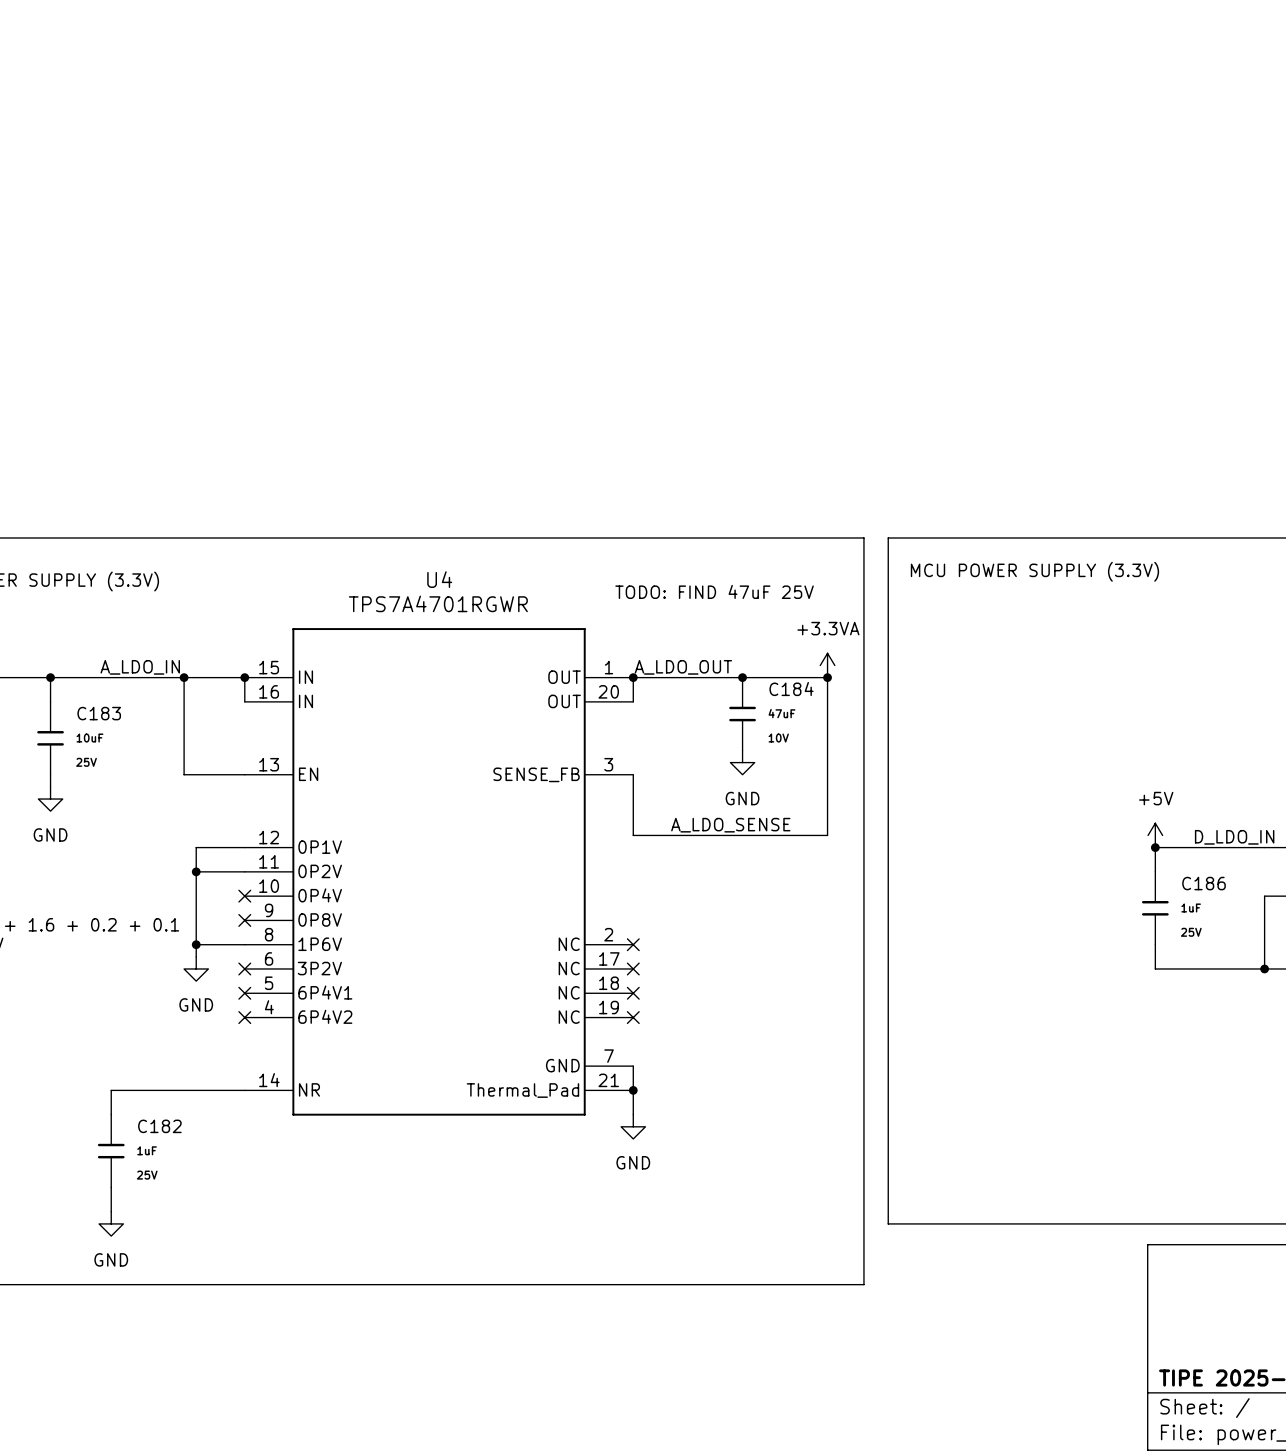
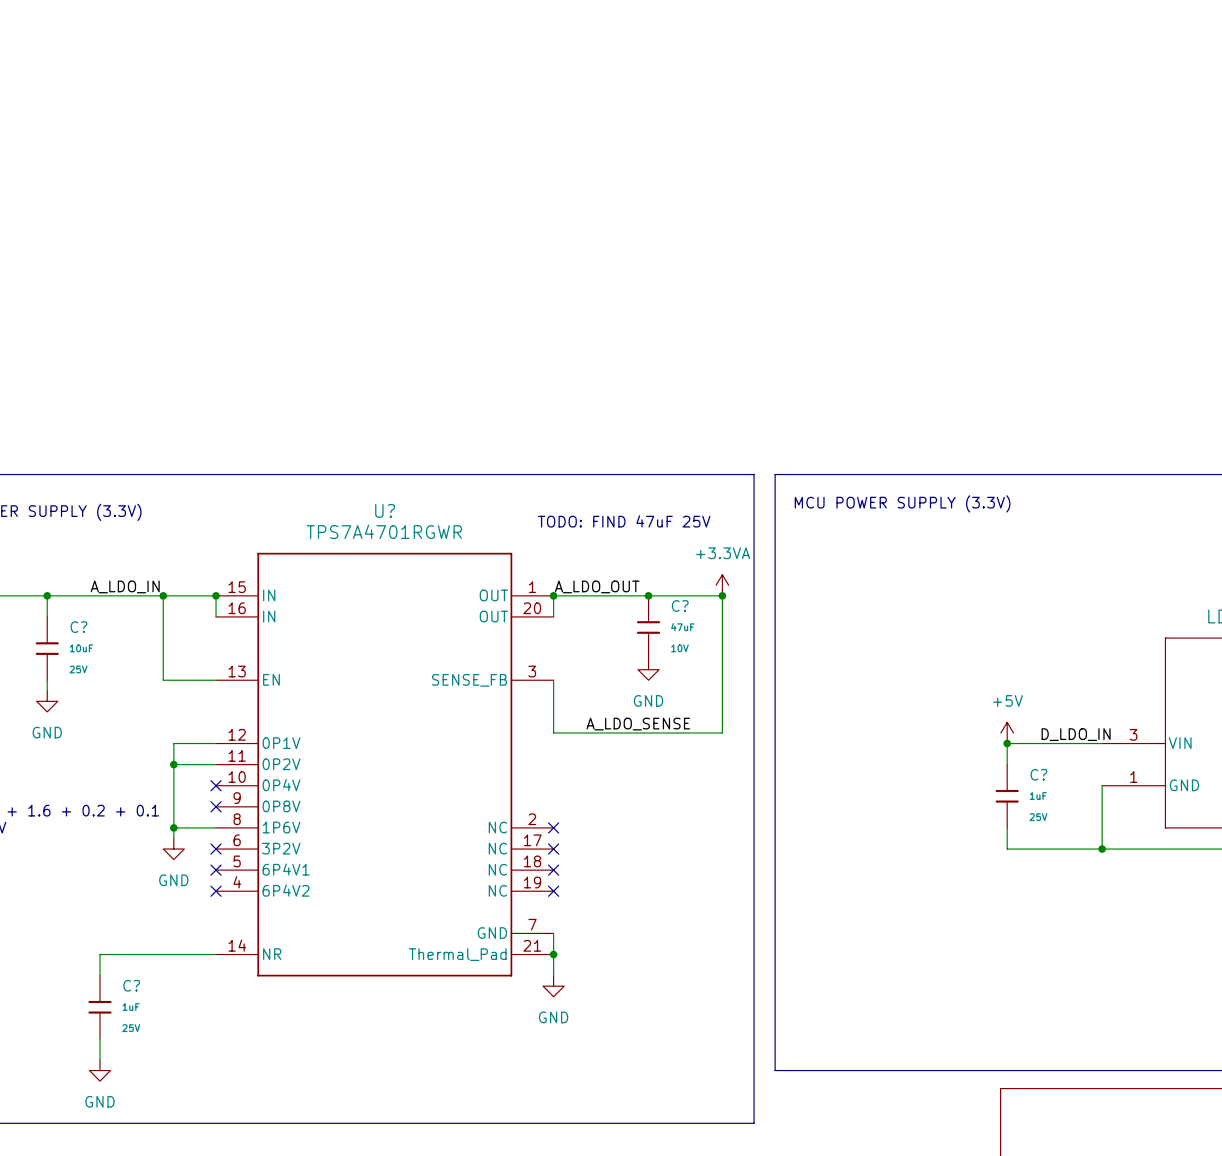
U4 name: U4 (439, 579) -> U? (385, 510)
C184 name: C184 (791, 689) -> C? (680, 606)
C183 name: C183 (99, 713) -> C? (78, 627)
C186 name: C186 (1204, 883) -> C? (1038, 774)
C182 name: C182 (159, 1126) -> C? (131, 985)

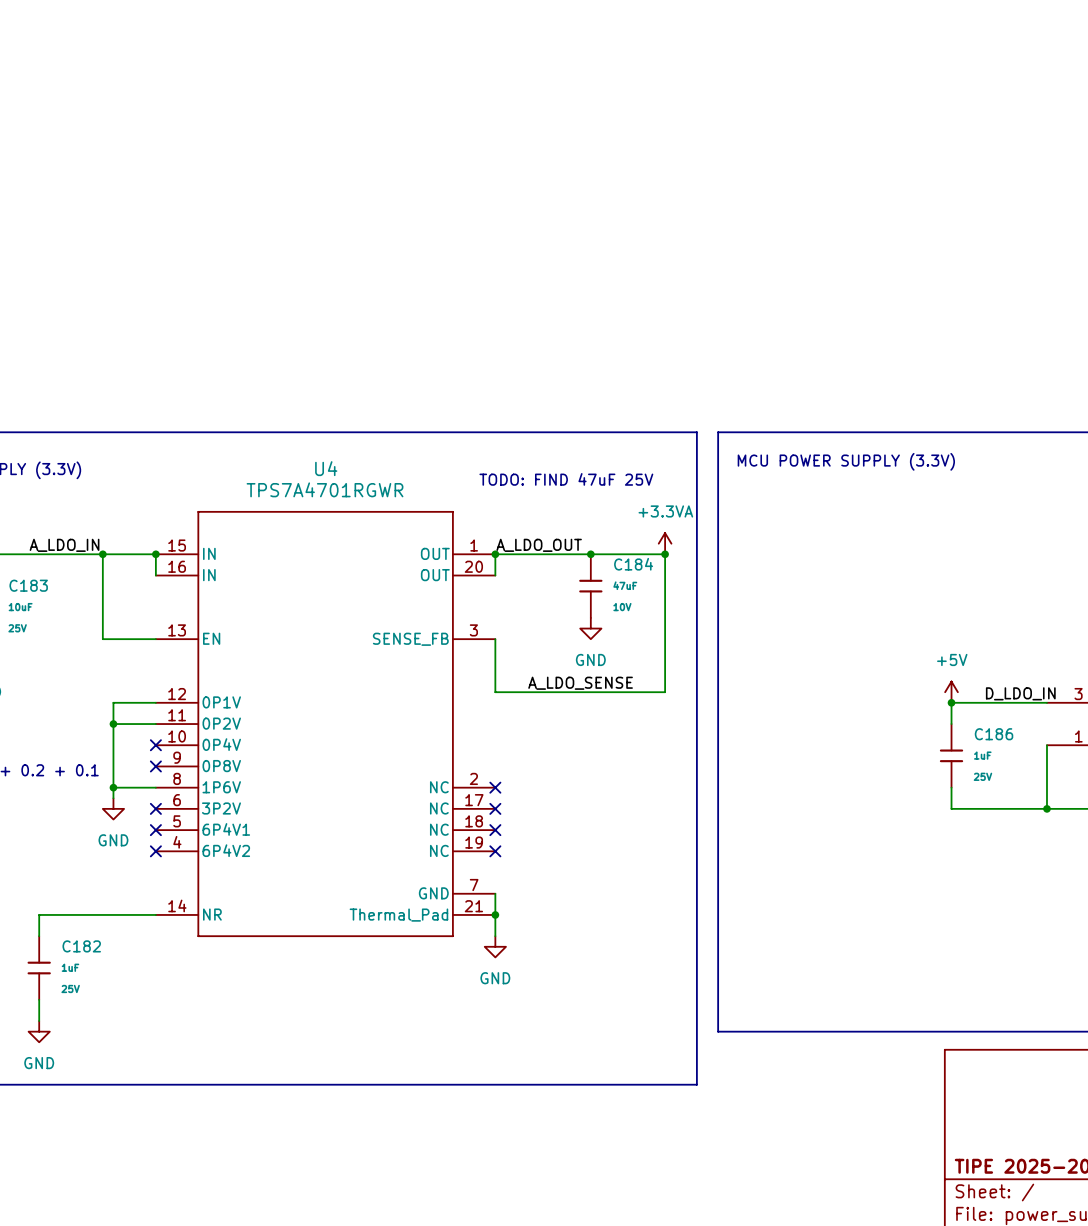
U? name: U? (385, 510) -> U4 (326, 468)
C? name: C? (680, 606) -> C184 (633, 564)
C? name: C? (78, 627) -> C183 (28, 585)
C? name: C? (1038, 774) -> C186 (994, 734)
C? name: C? (131, 985) -> C182 (81, 946)

